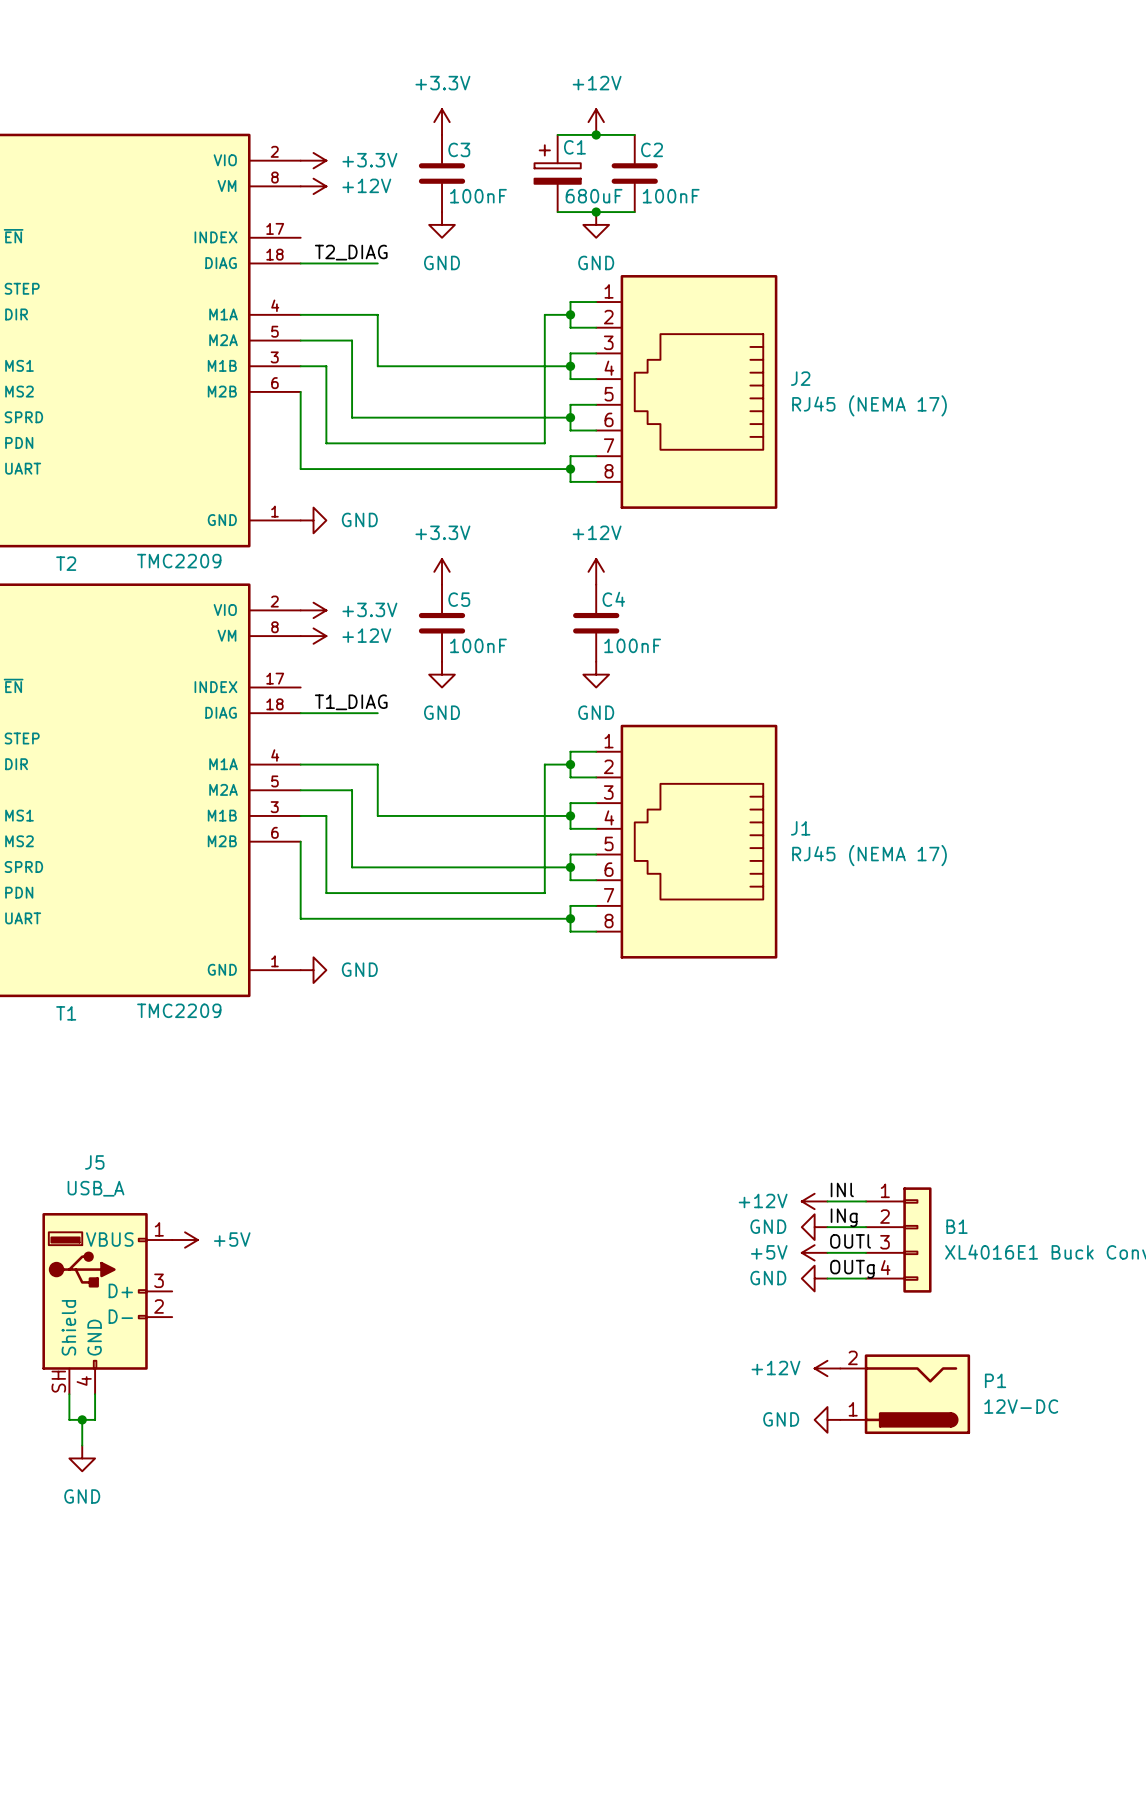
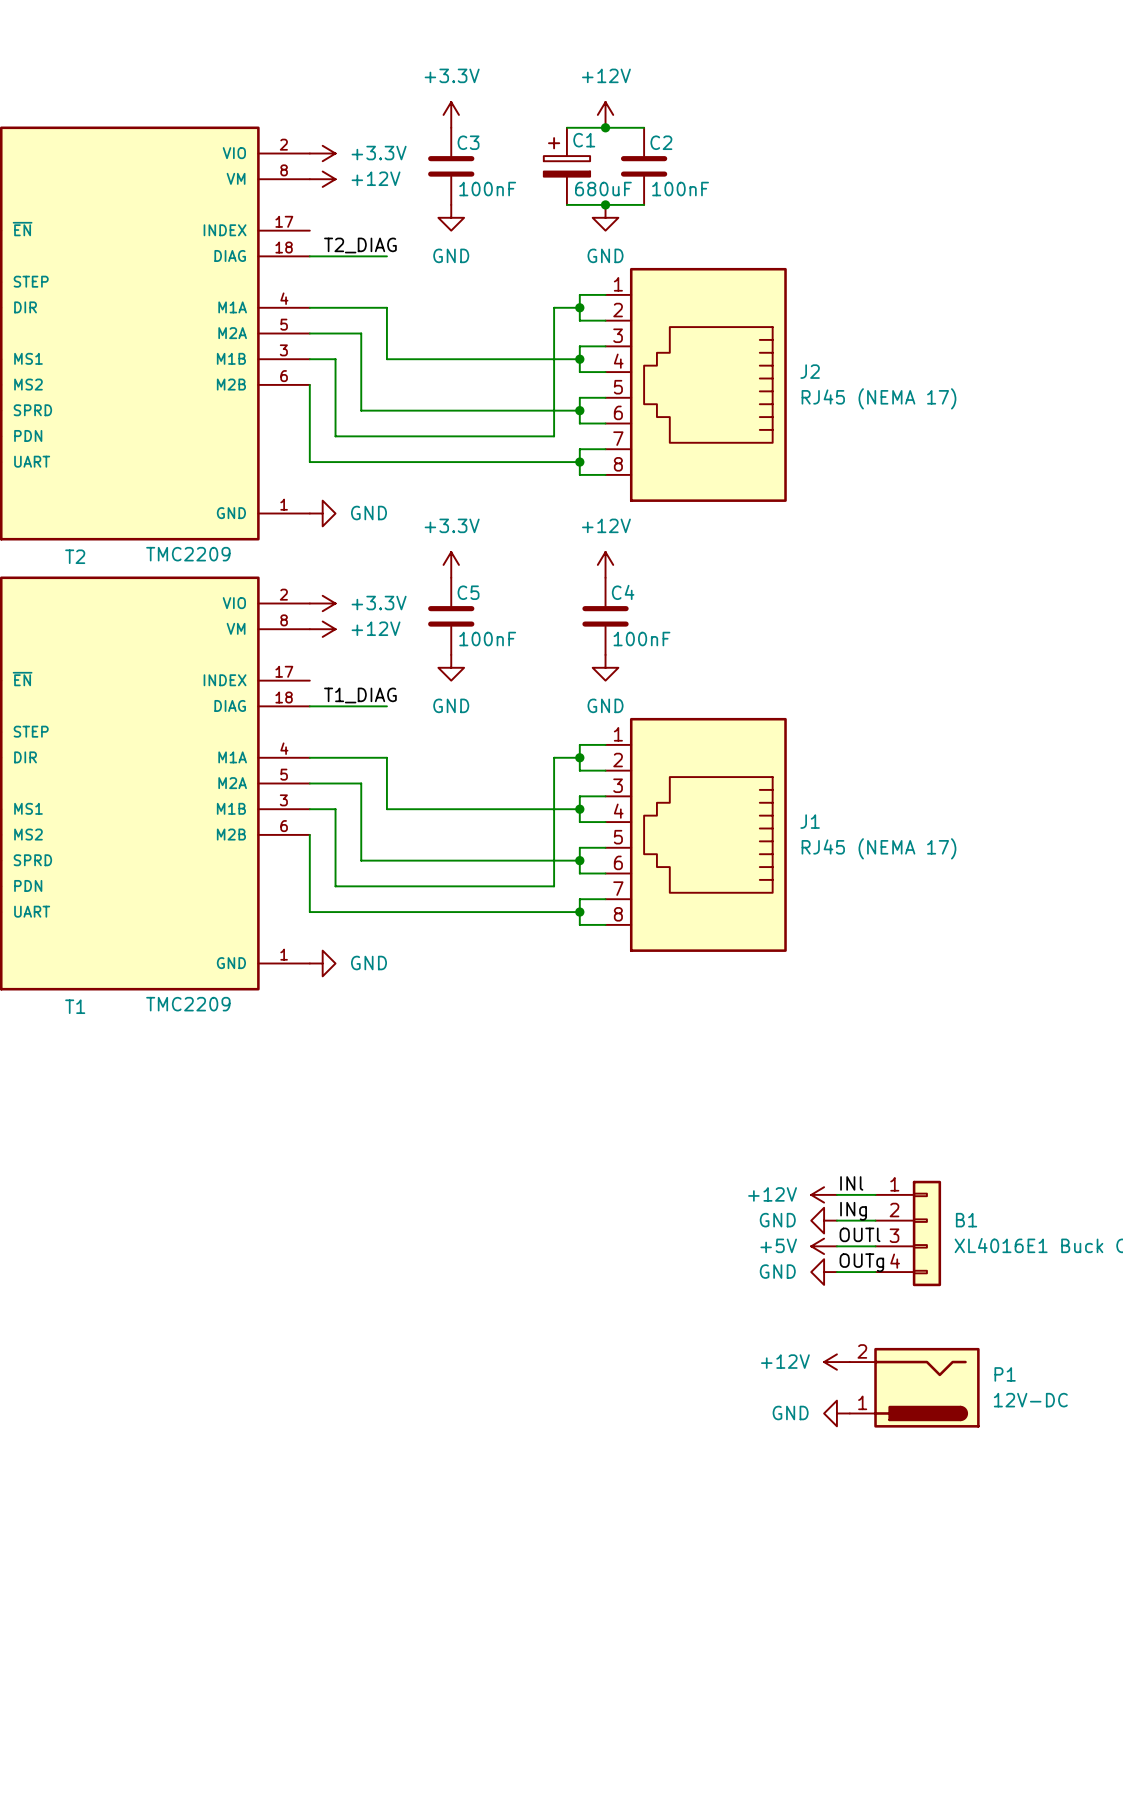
power symbol: +5V (185, 1240) -> none
J5: USB_A (107, 1303) -> none
wire: (69, 1394) (69, 1419) (95, 1419) (95, 1394) -> none
wire: (82, 1419) (82, 1445) -> none
junction: (82, 1419) -> none
power symbol: GND (82, 1458) -> none

